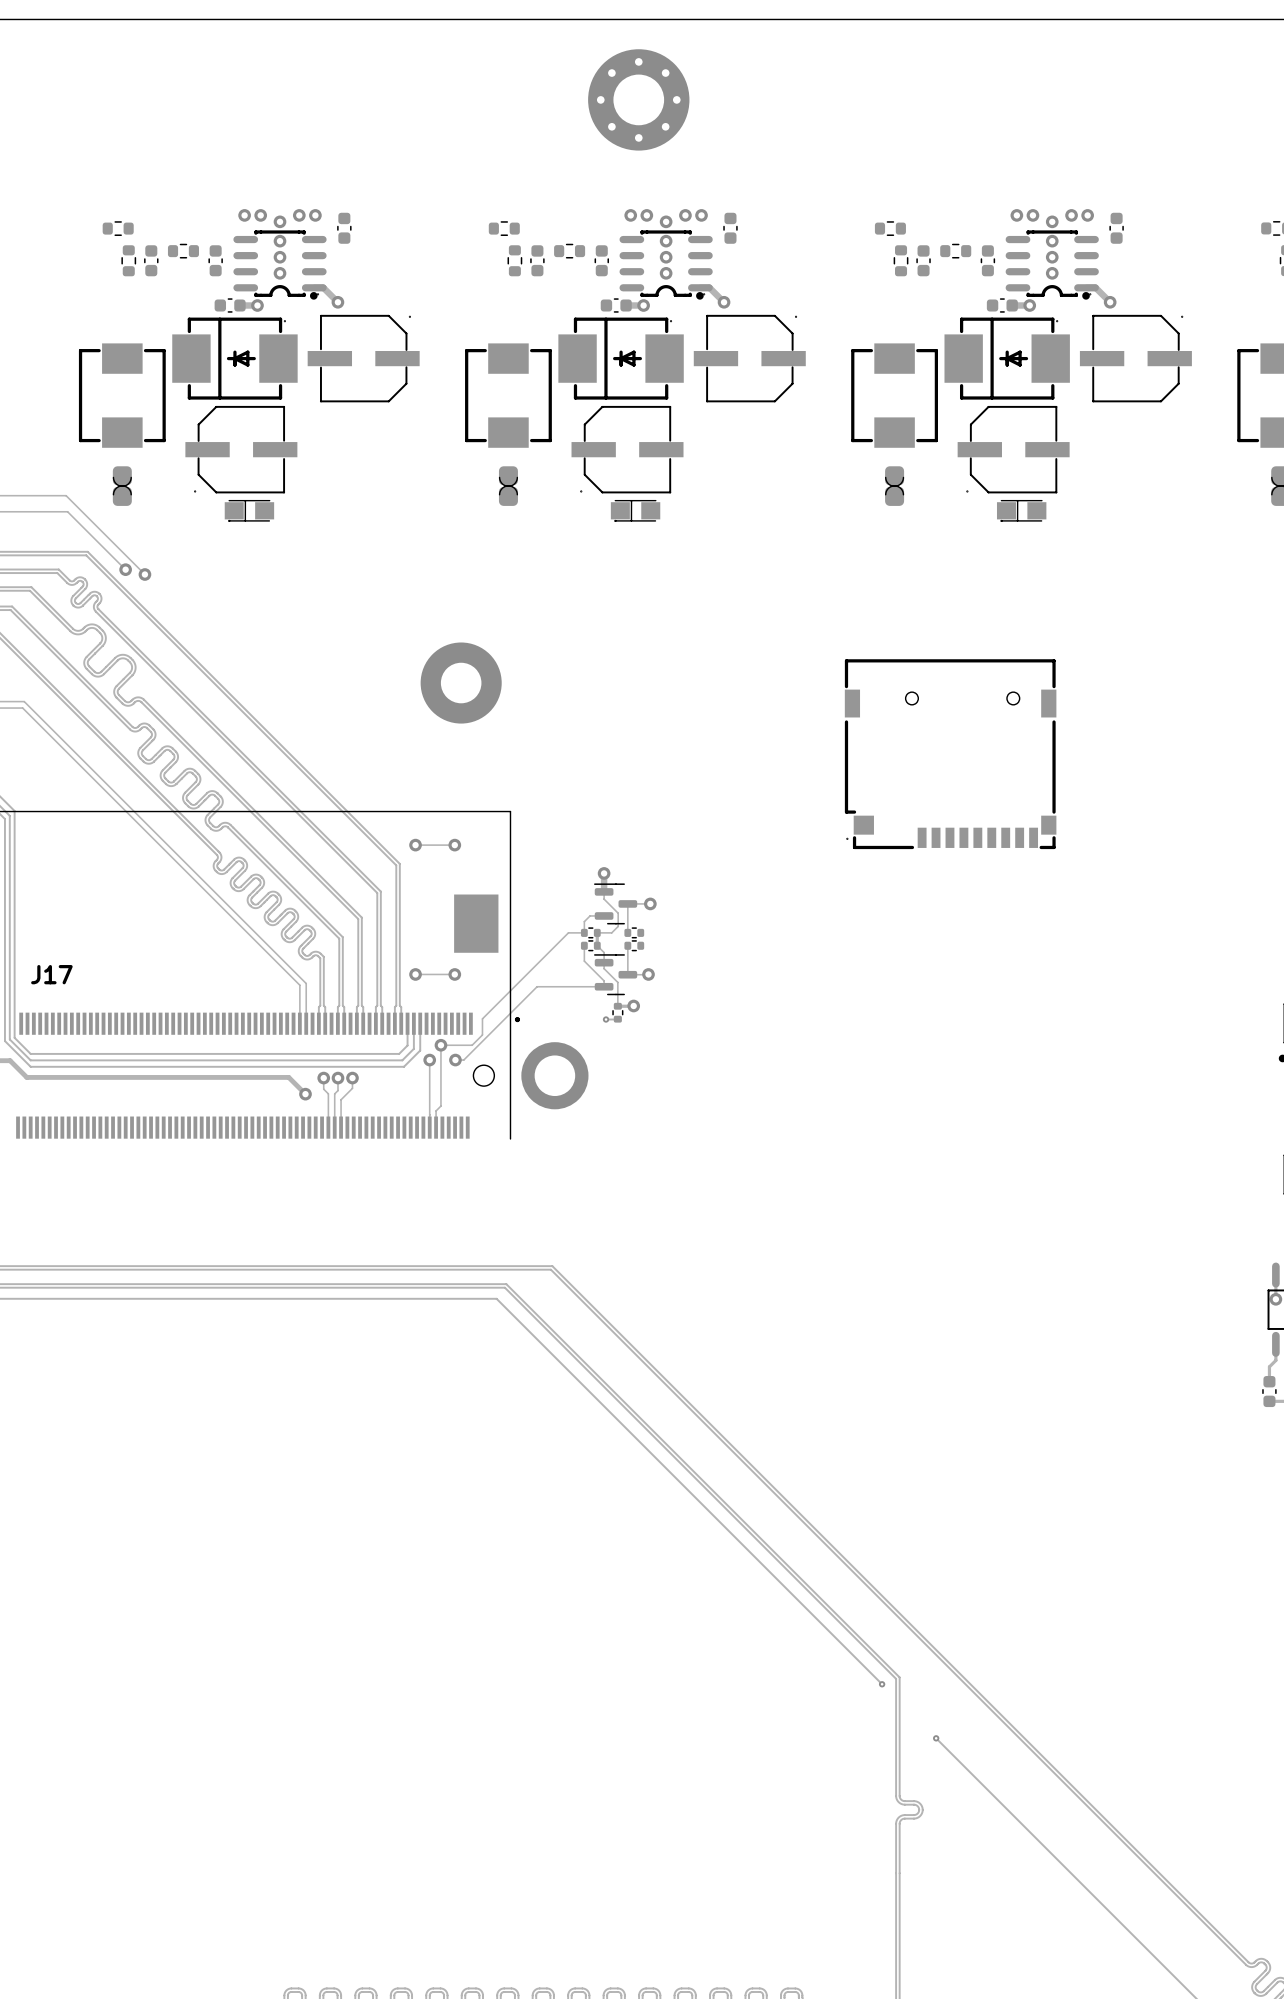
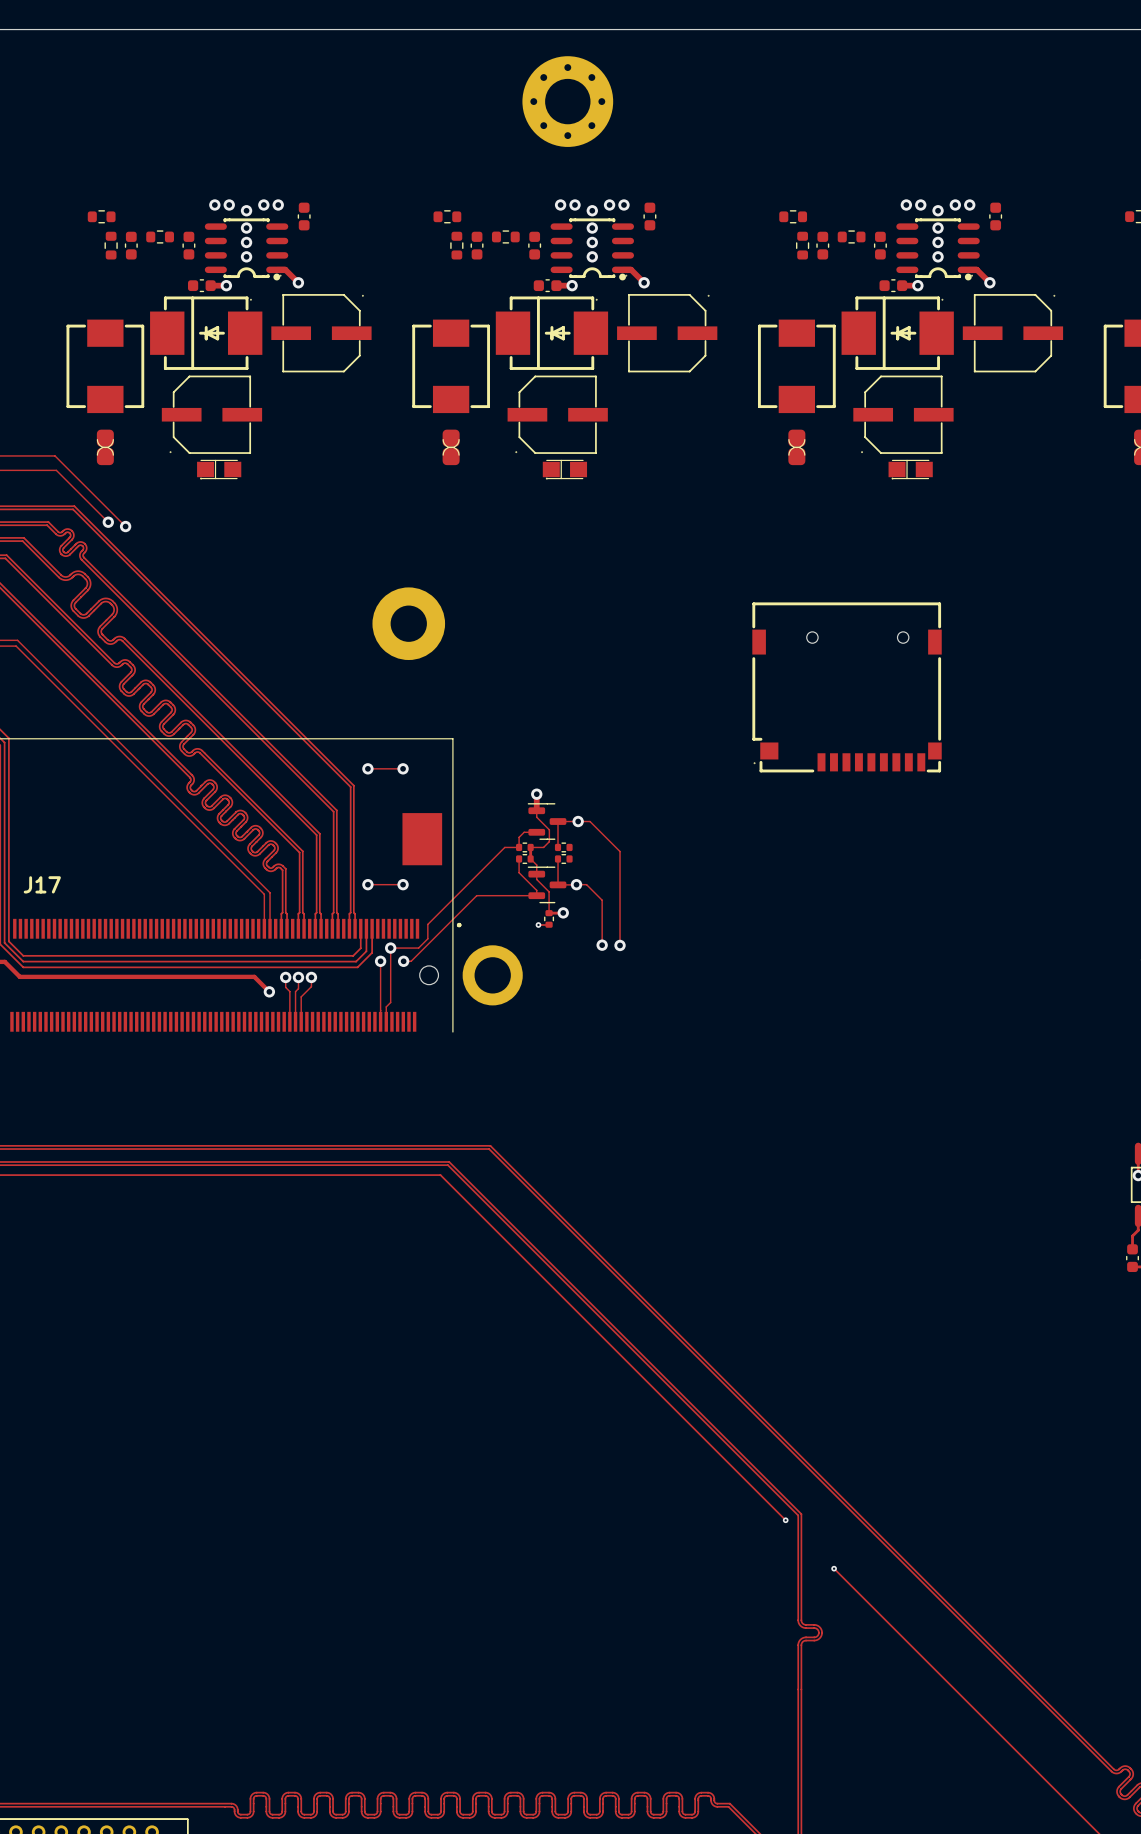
track: none -> (578, 821) (590, 821) (620, 851) (620, 945)
track: none -> (576, 884) (586, 884) (602, 900) (602, 945)
via: none -> (602, 945)
via: none -> (620, 945)

